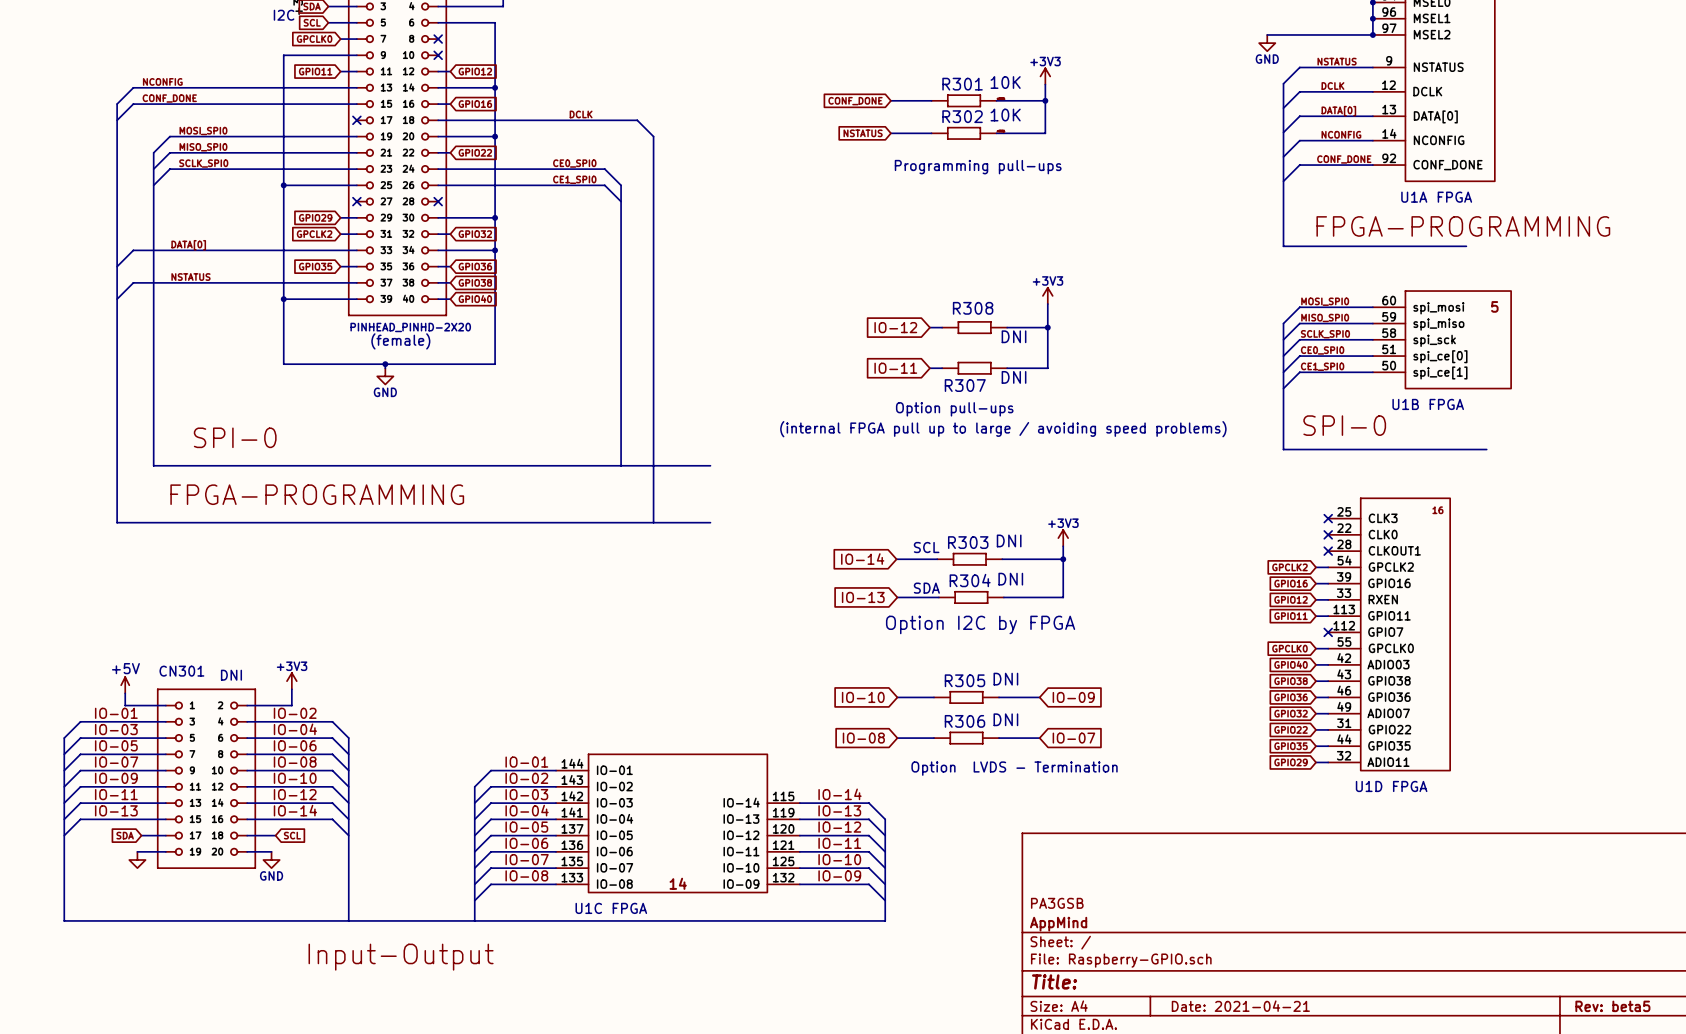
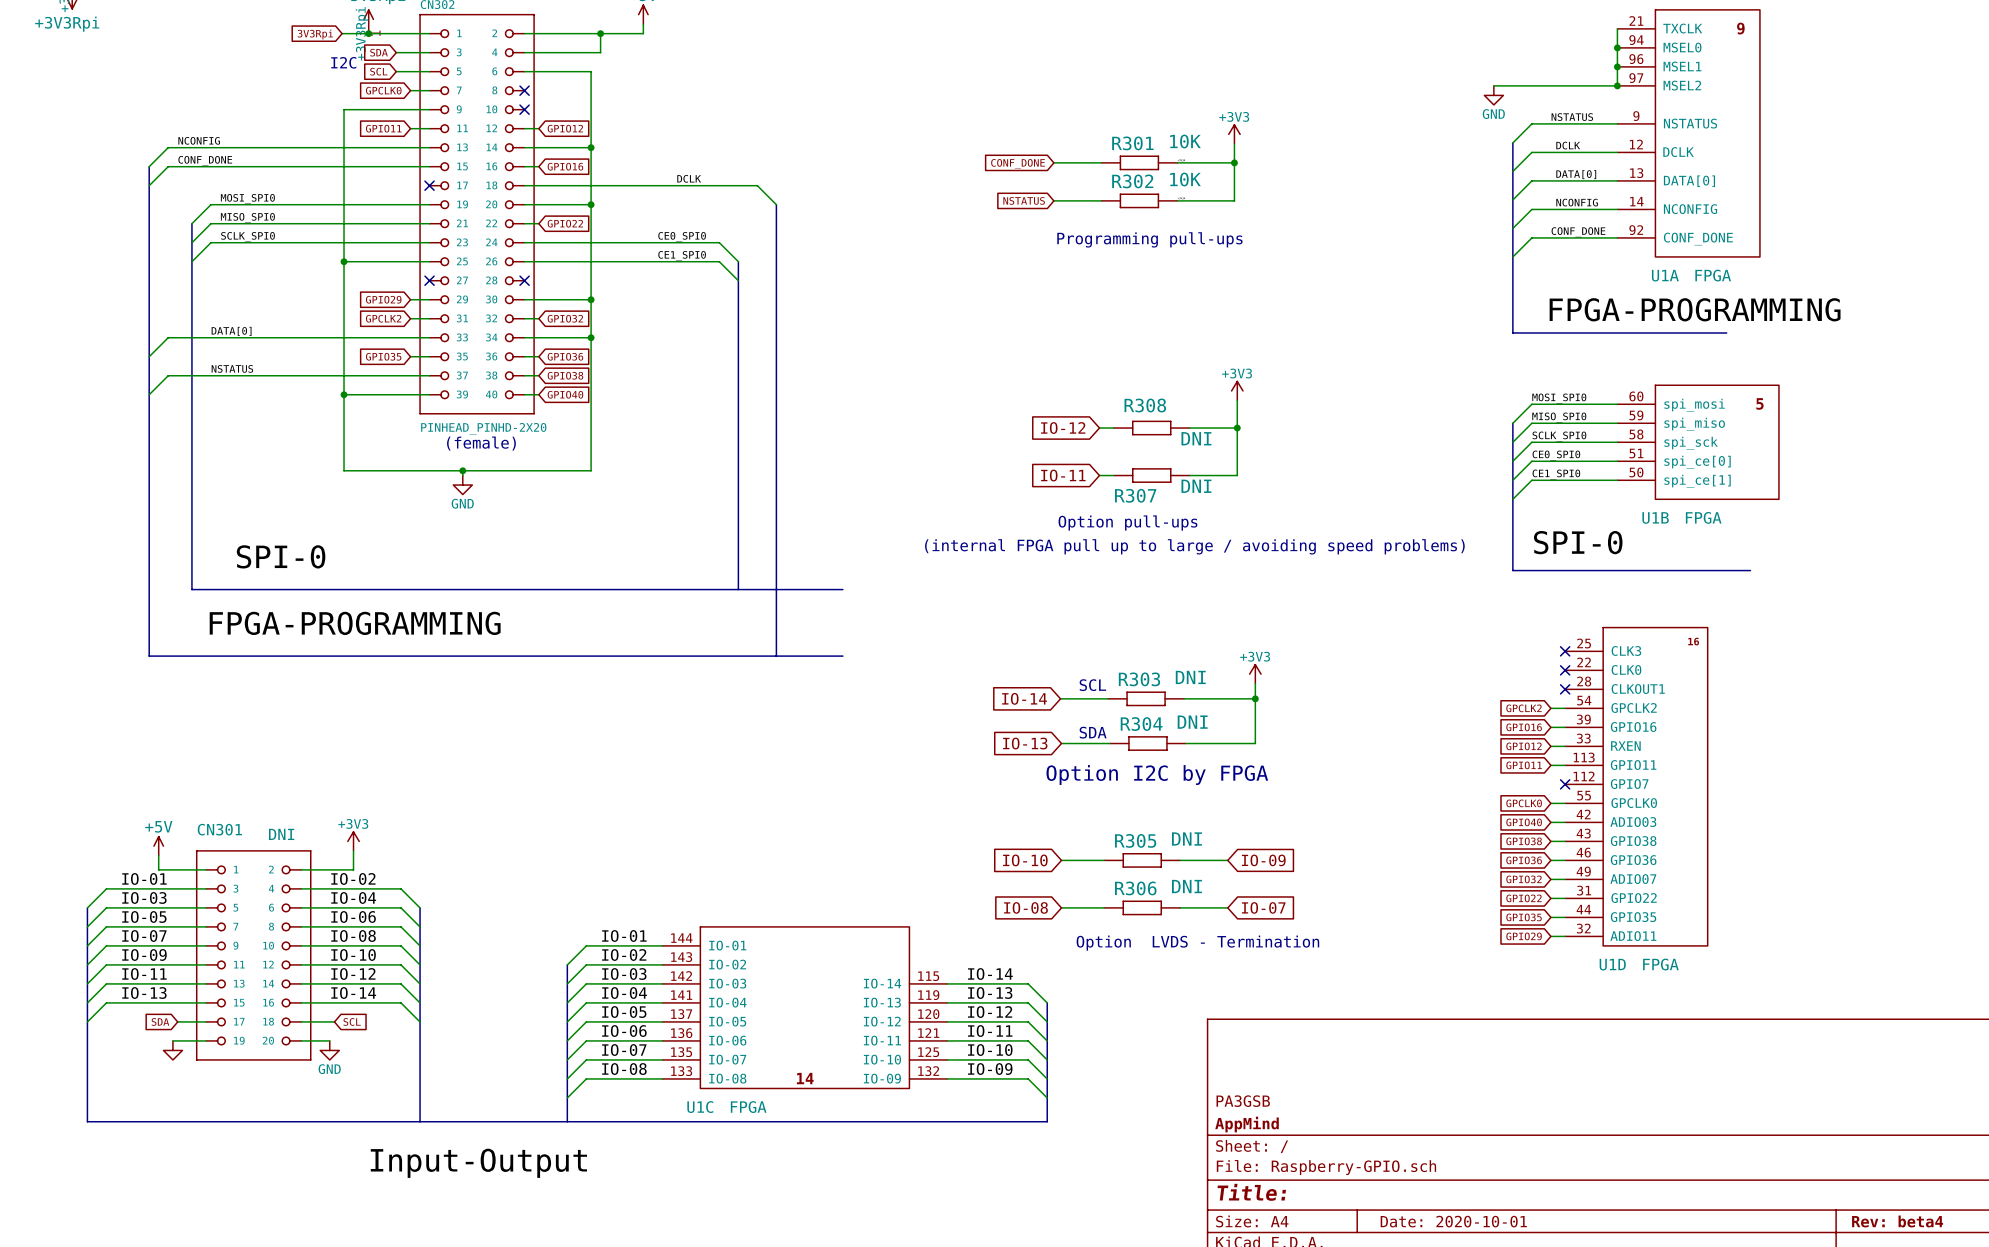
title block: Date: 2021-04-21 (1240, 1006) -> Date: 2020-10-01 (1453, 1221)
title block: Rev: beta5 (1612, 1006) -> Rev: beta4 (1897, 1221)

